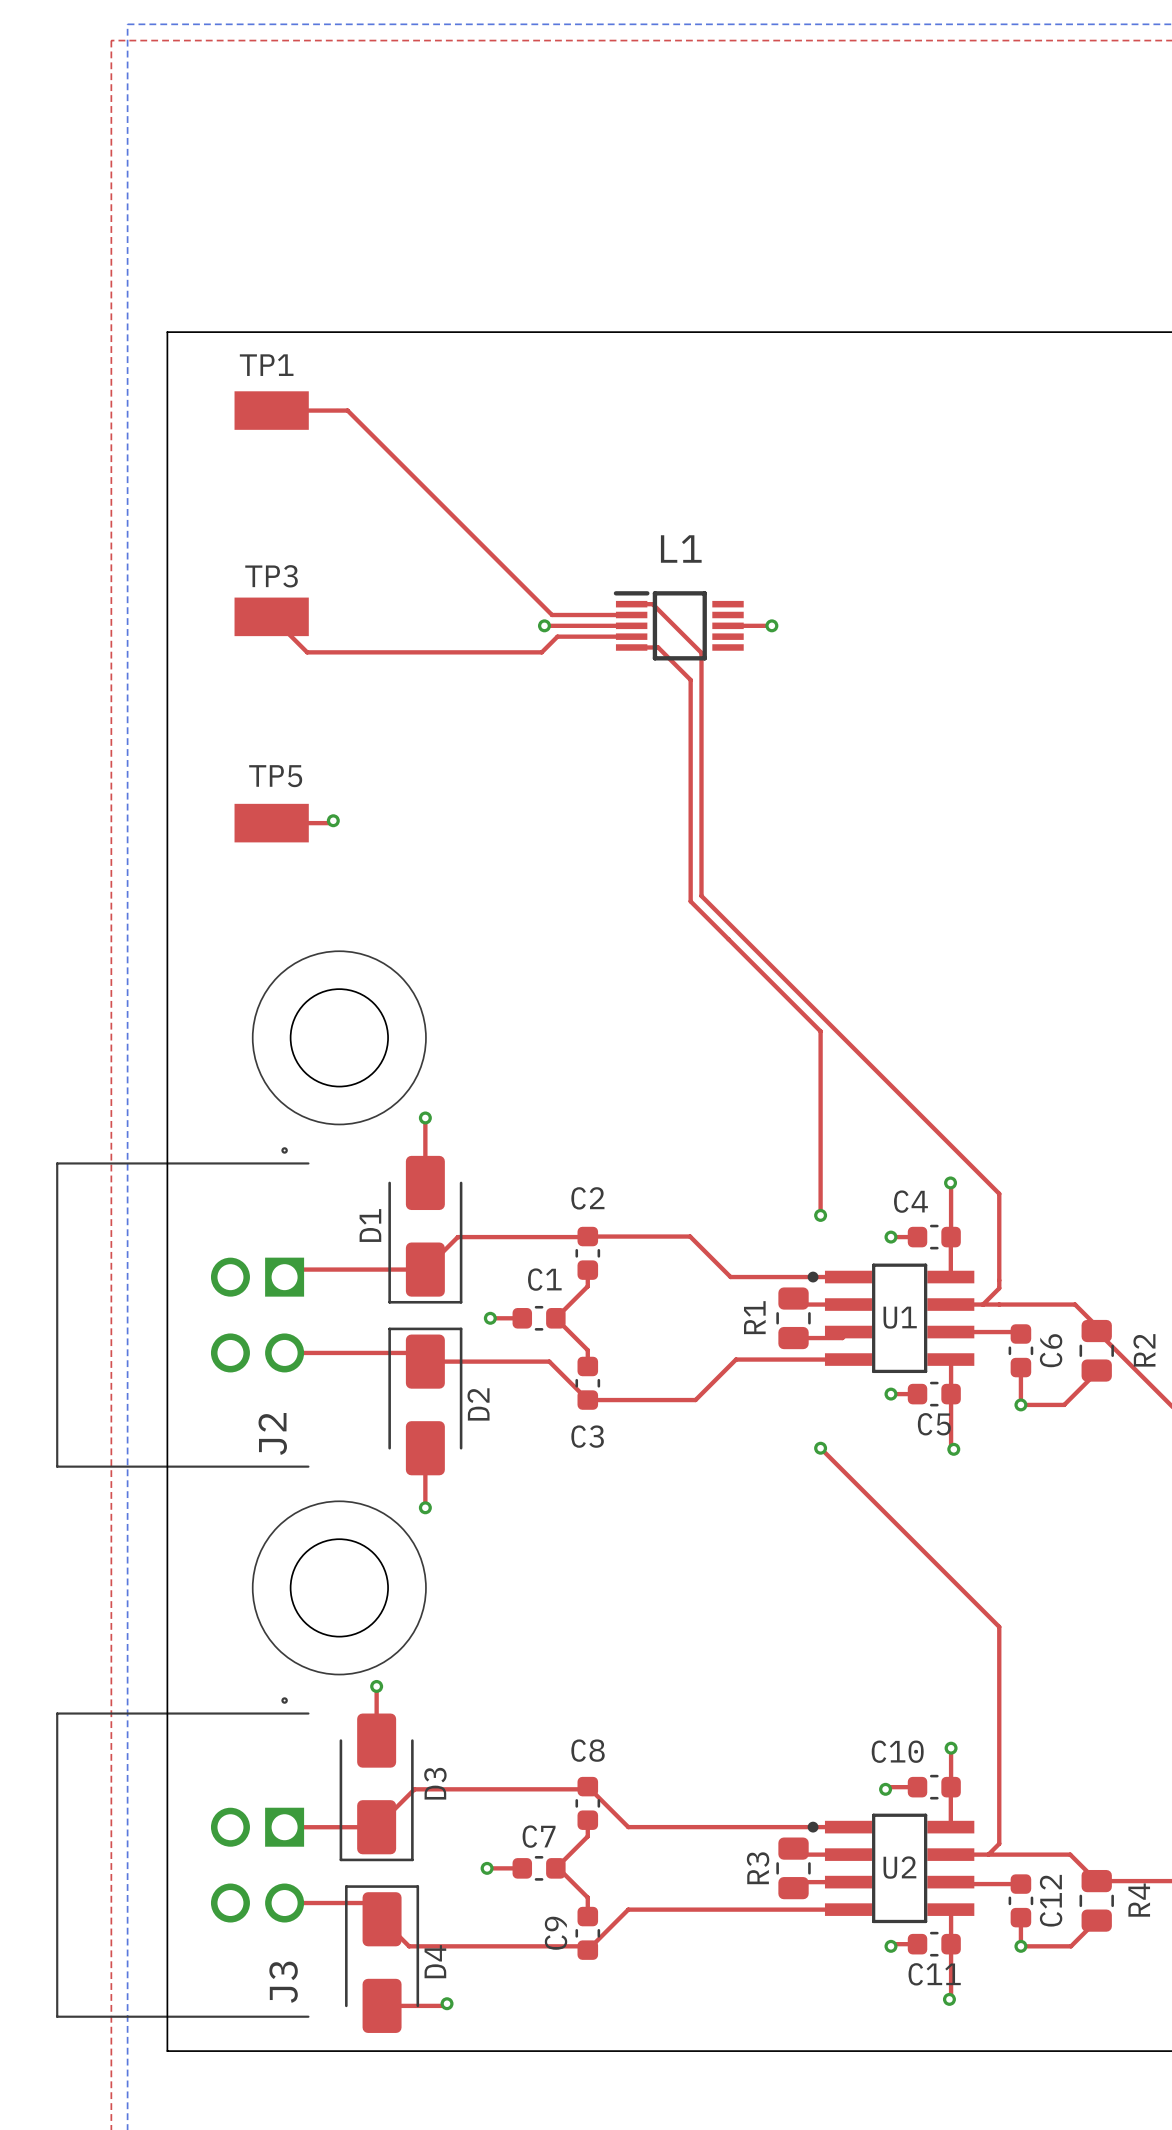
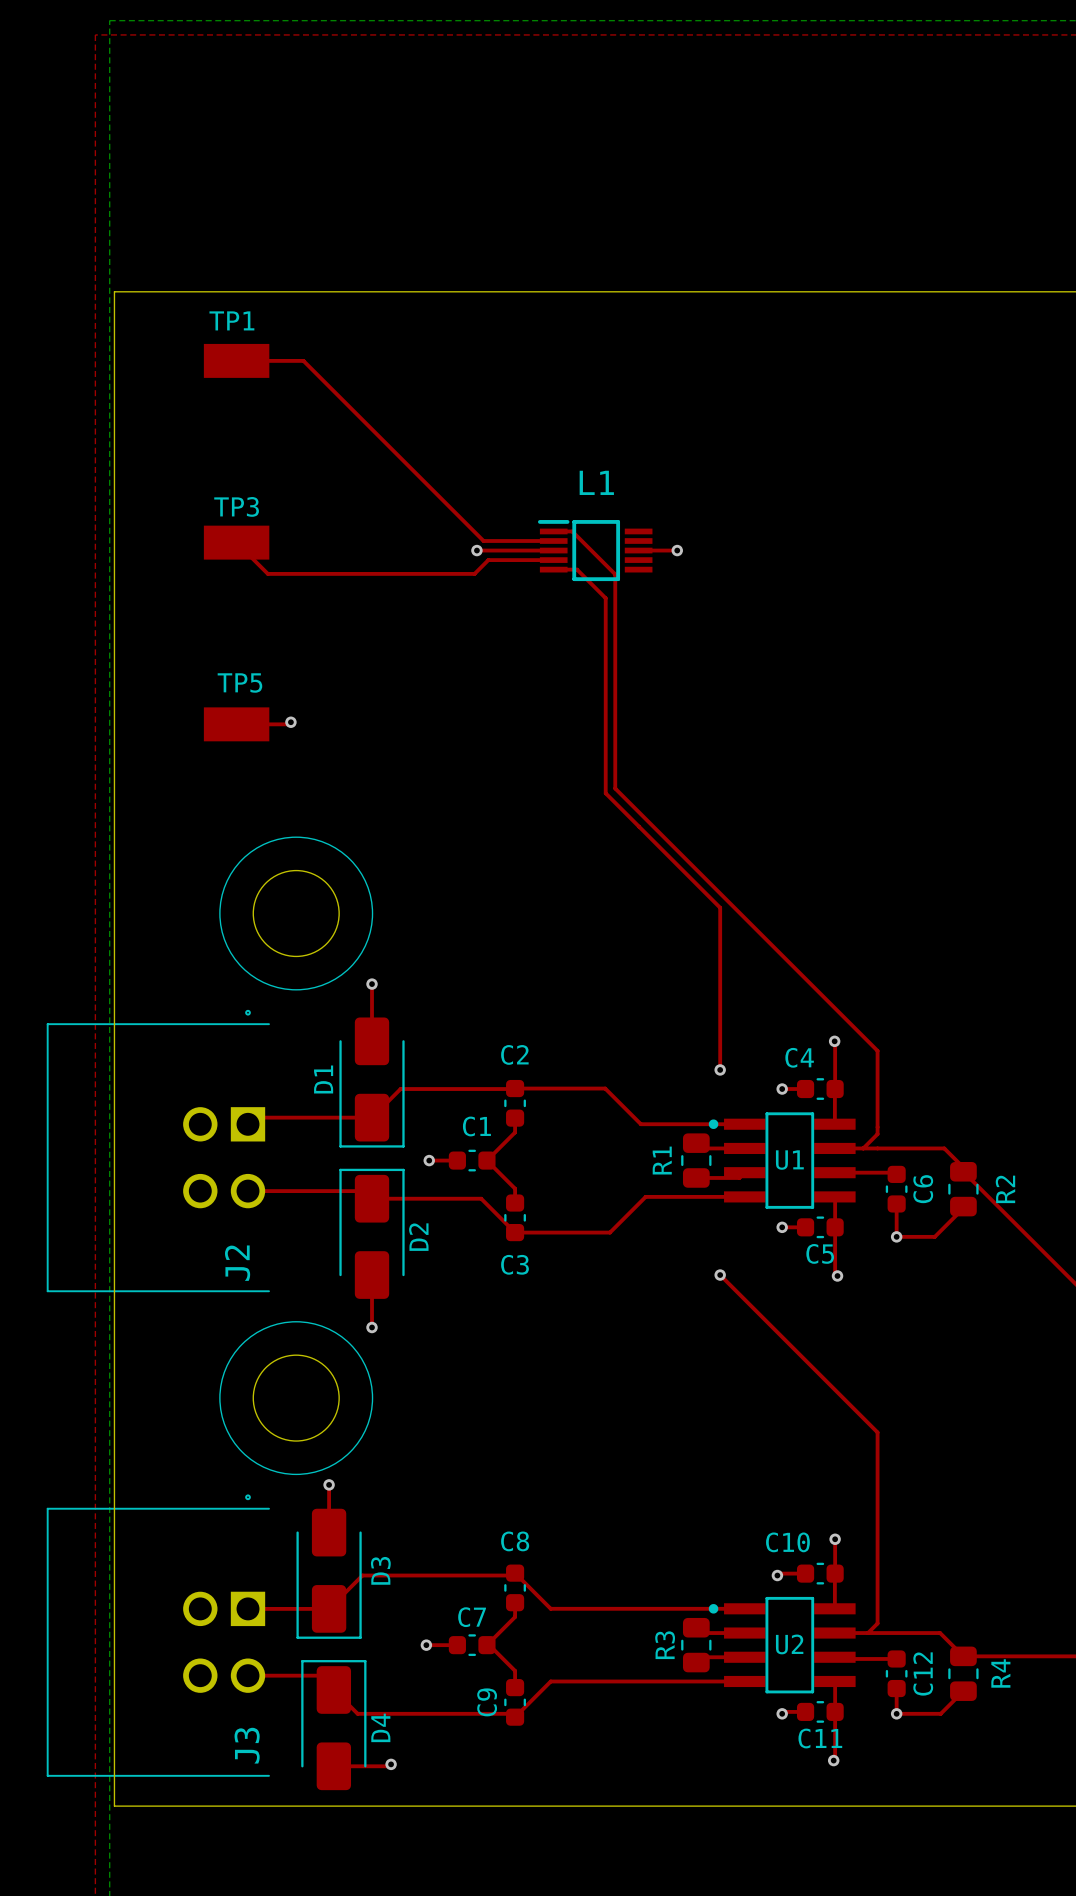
board edge: (167, 332) (167, 2051) -> (144, 291) (114, 291) (114, 1806) (144, 1806)

